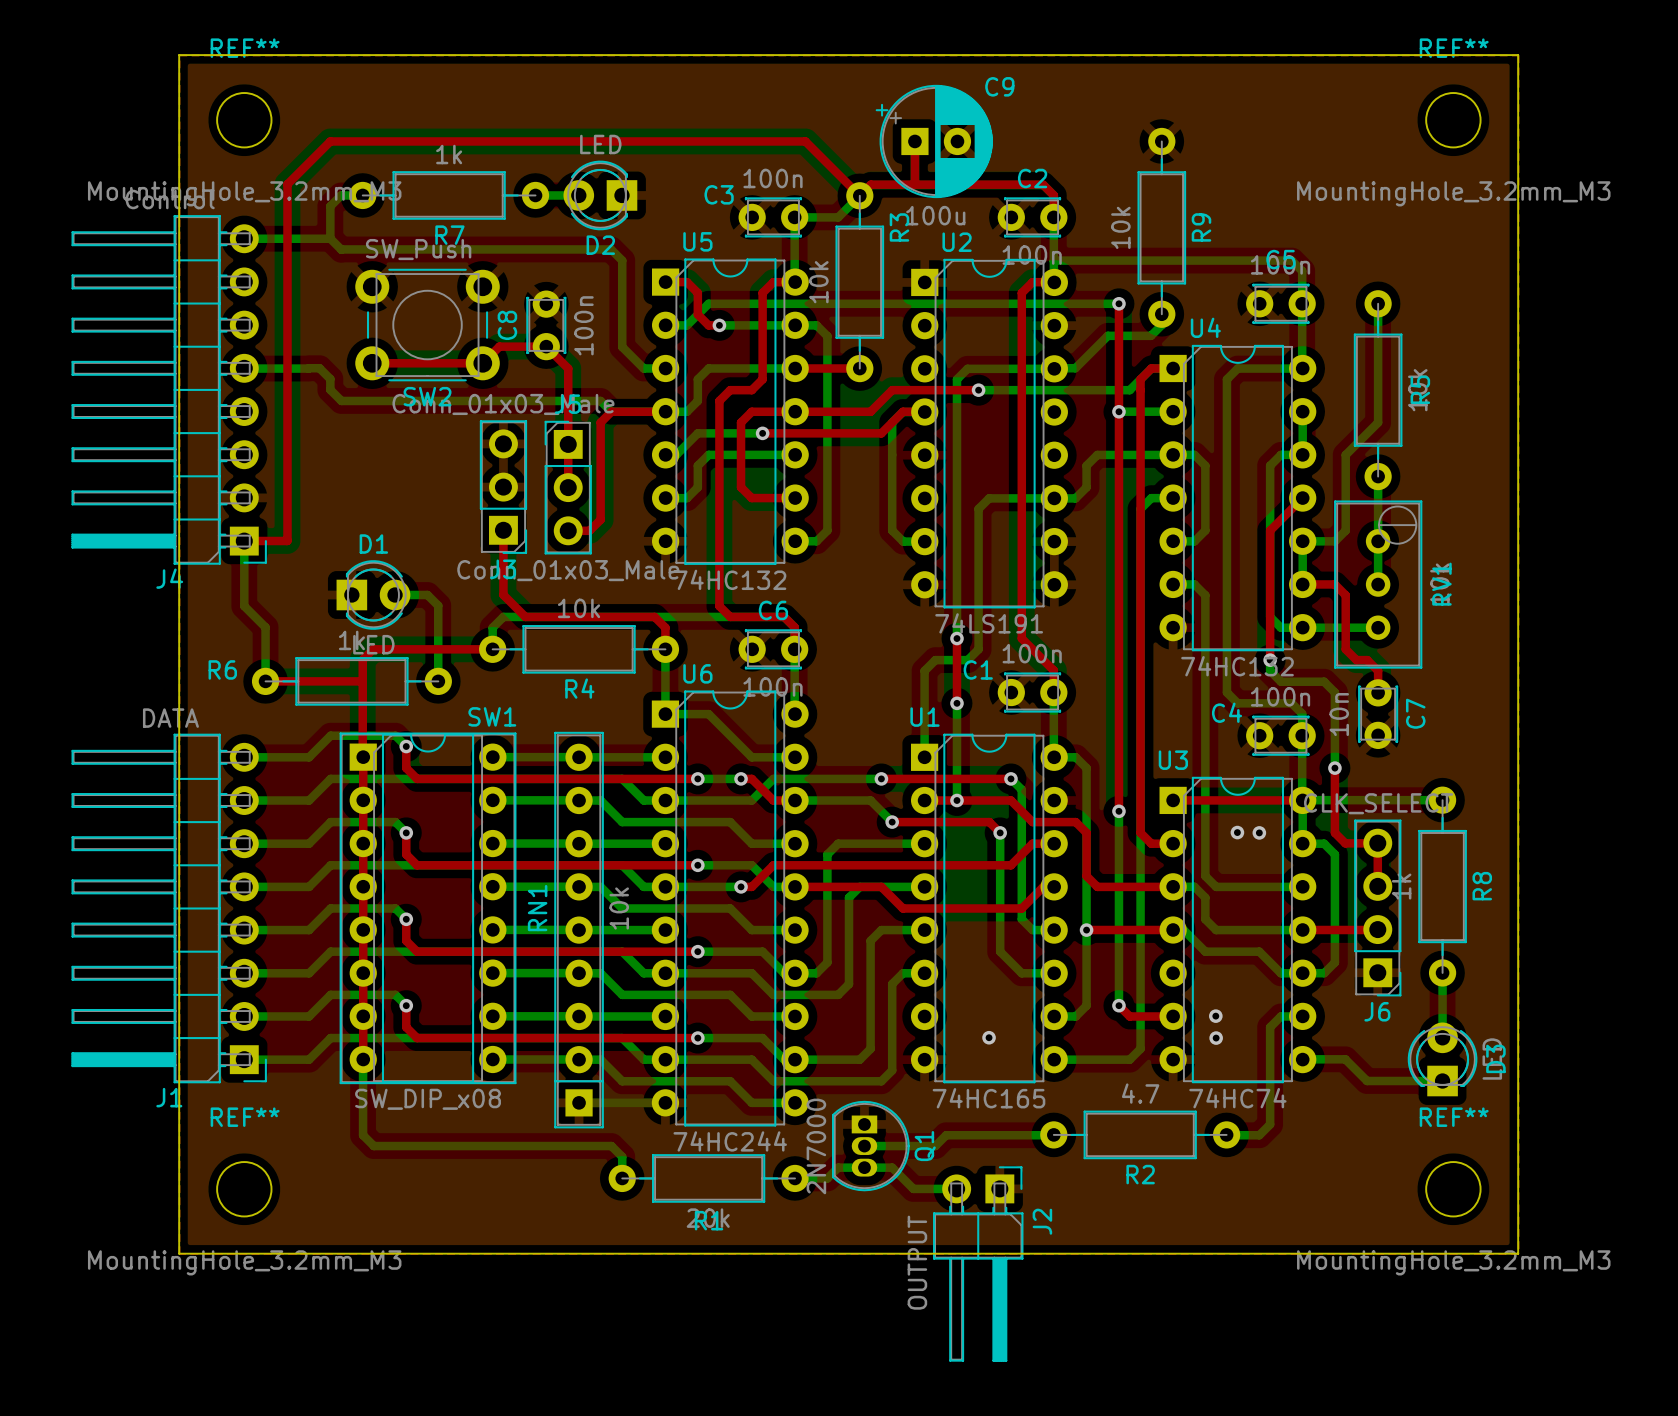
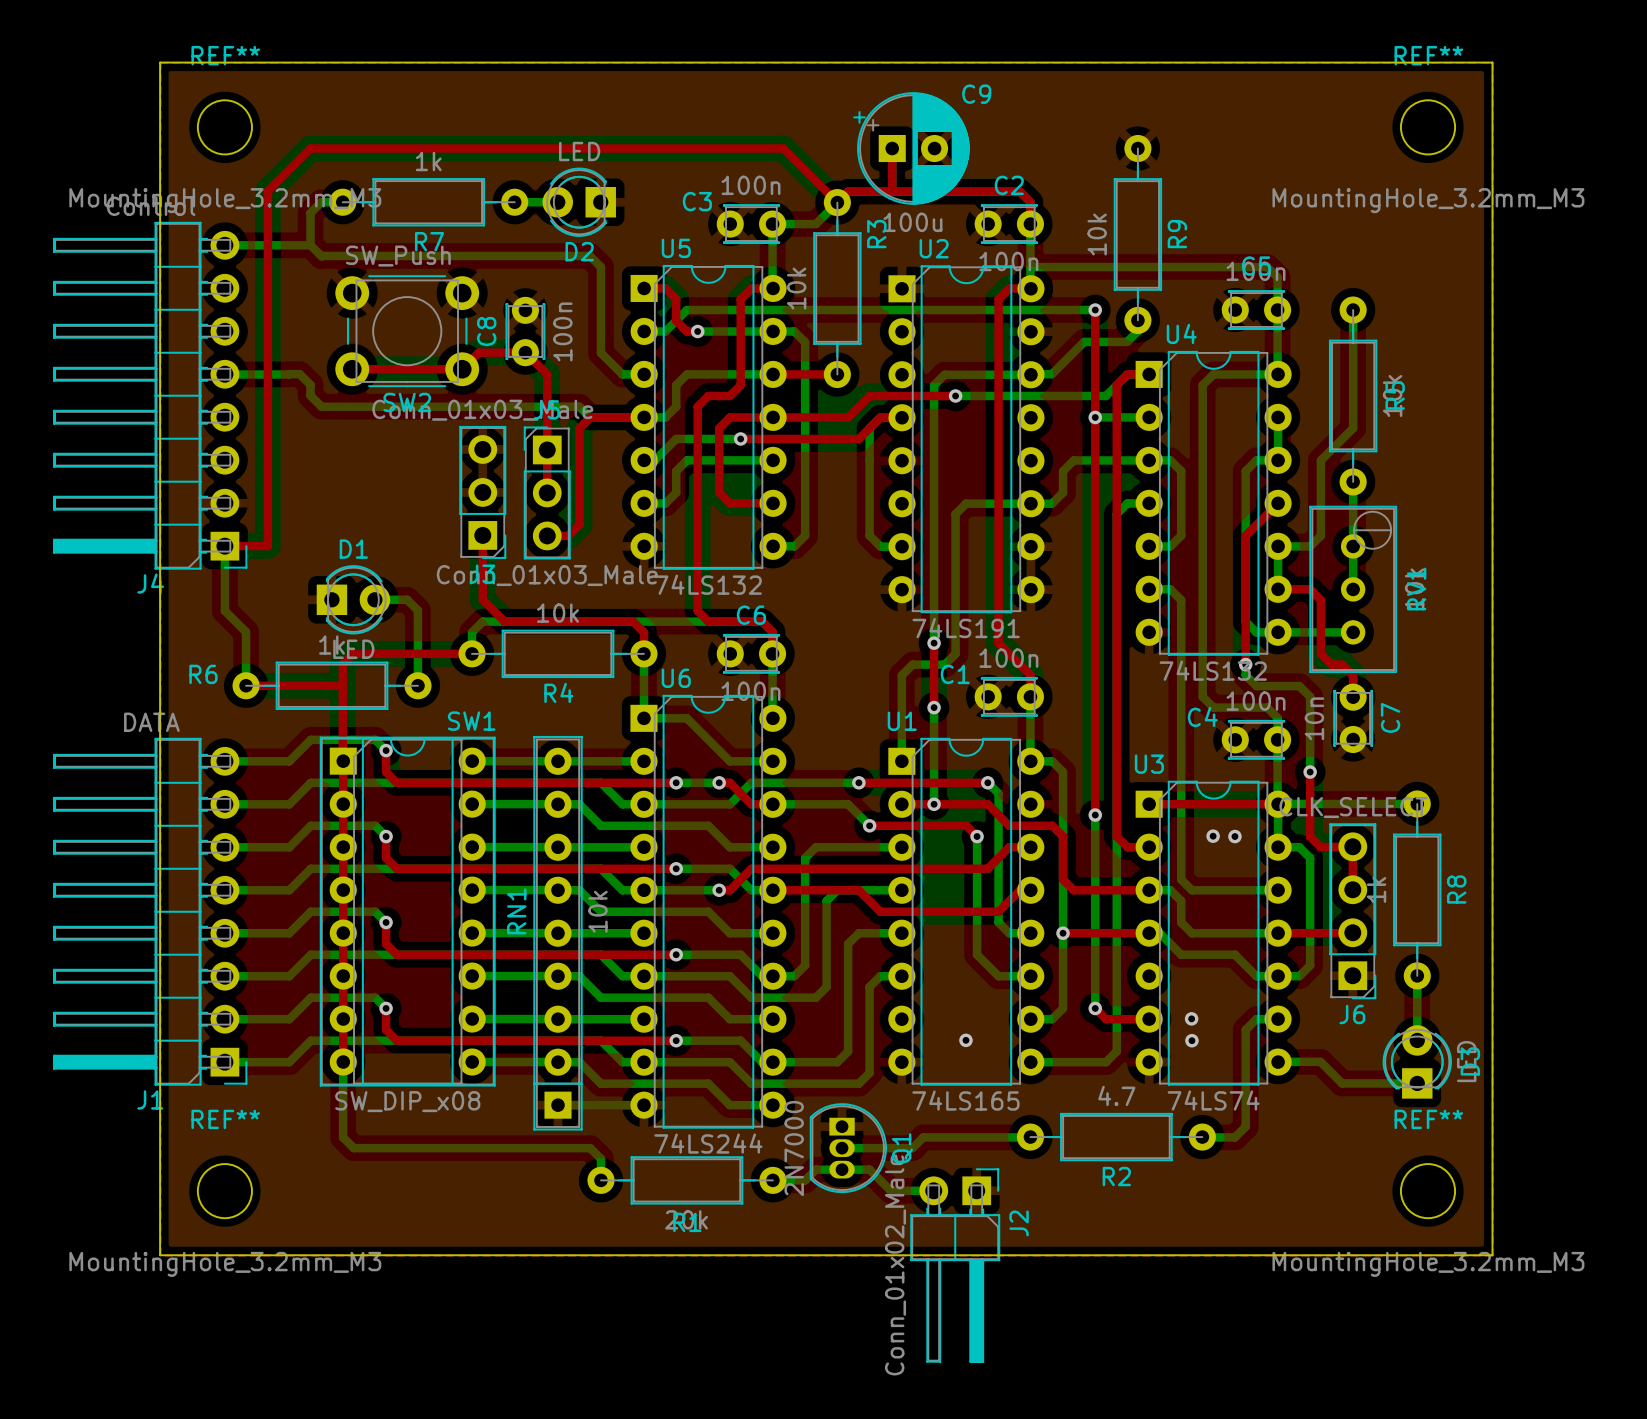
U5 value: 74HC132 (729, 579) -> 74LS132 (708, 584)
U4 value: 74HC132 (1237, 666) -> 74LS132 (1213, 670)
U1 value: 74HC165 (988, 1098) -> 74LS165 (965, 1100)
U3 value: 74HC74 (1237, 1098) -> 74LS74 (1213, 1100)
U6 value: 74HC244 (730, 1141) -> 74LS244 (708, 1143)
J2 value: OUTPUT (917, 1262) -> Conn_01x02_Male (895, 1264)

